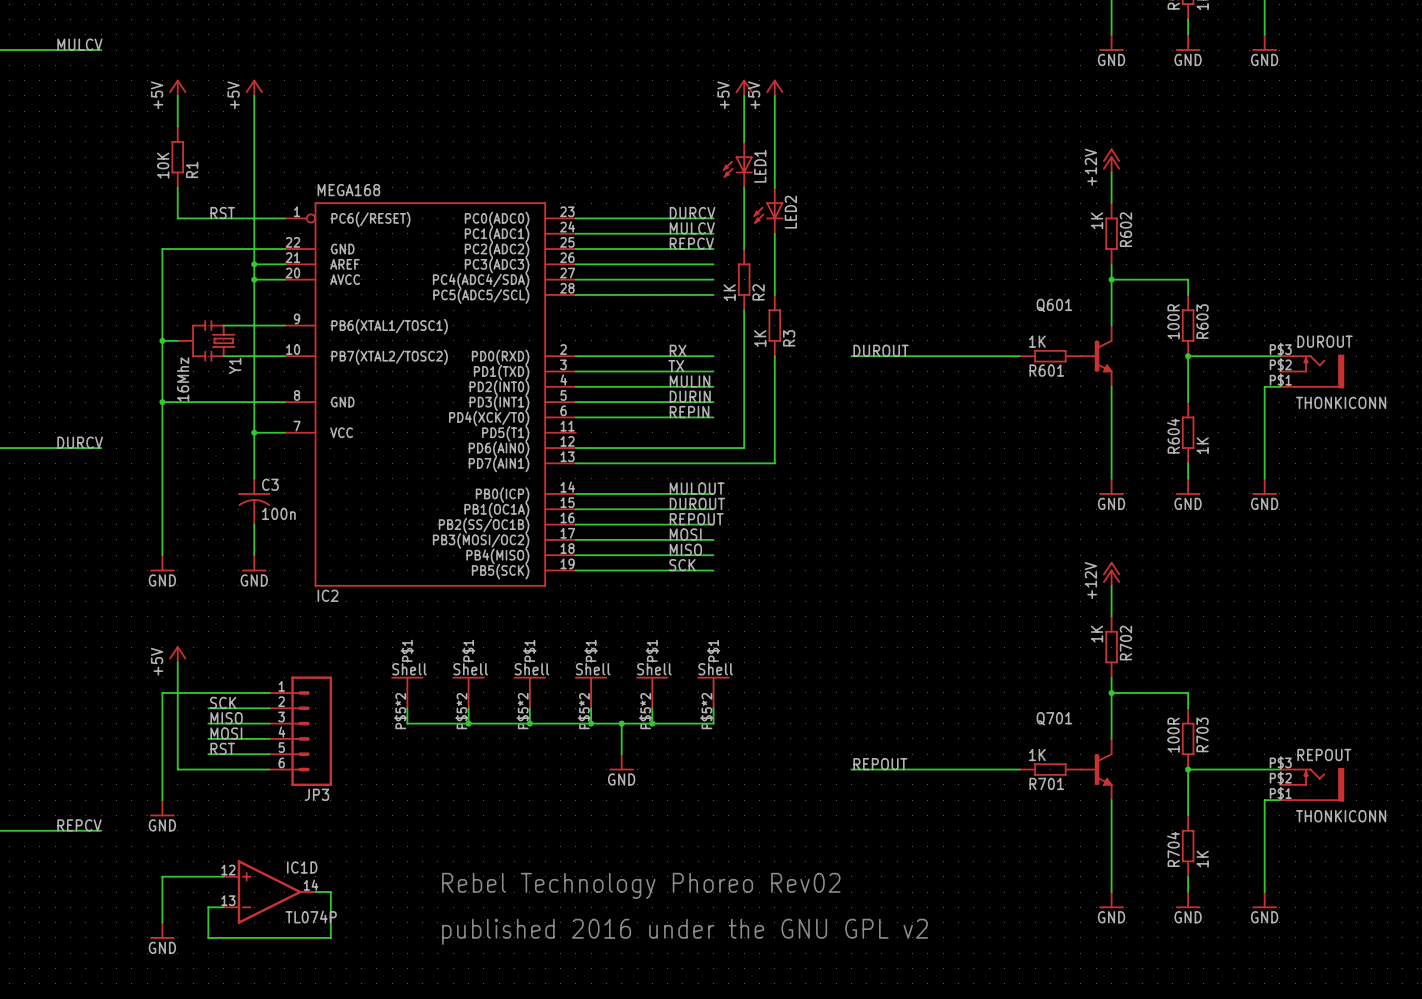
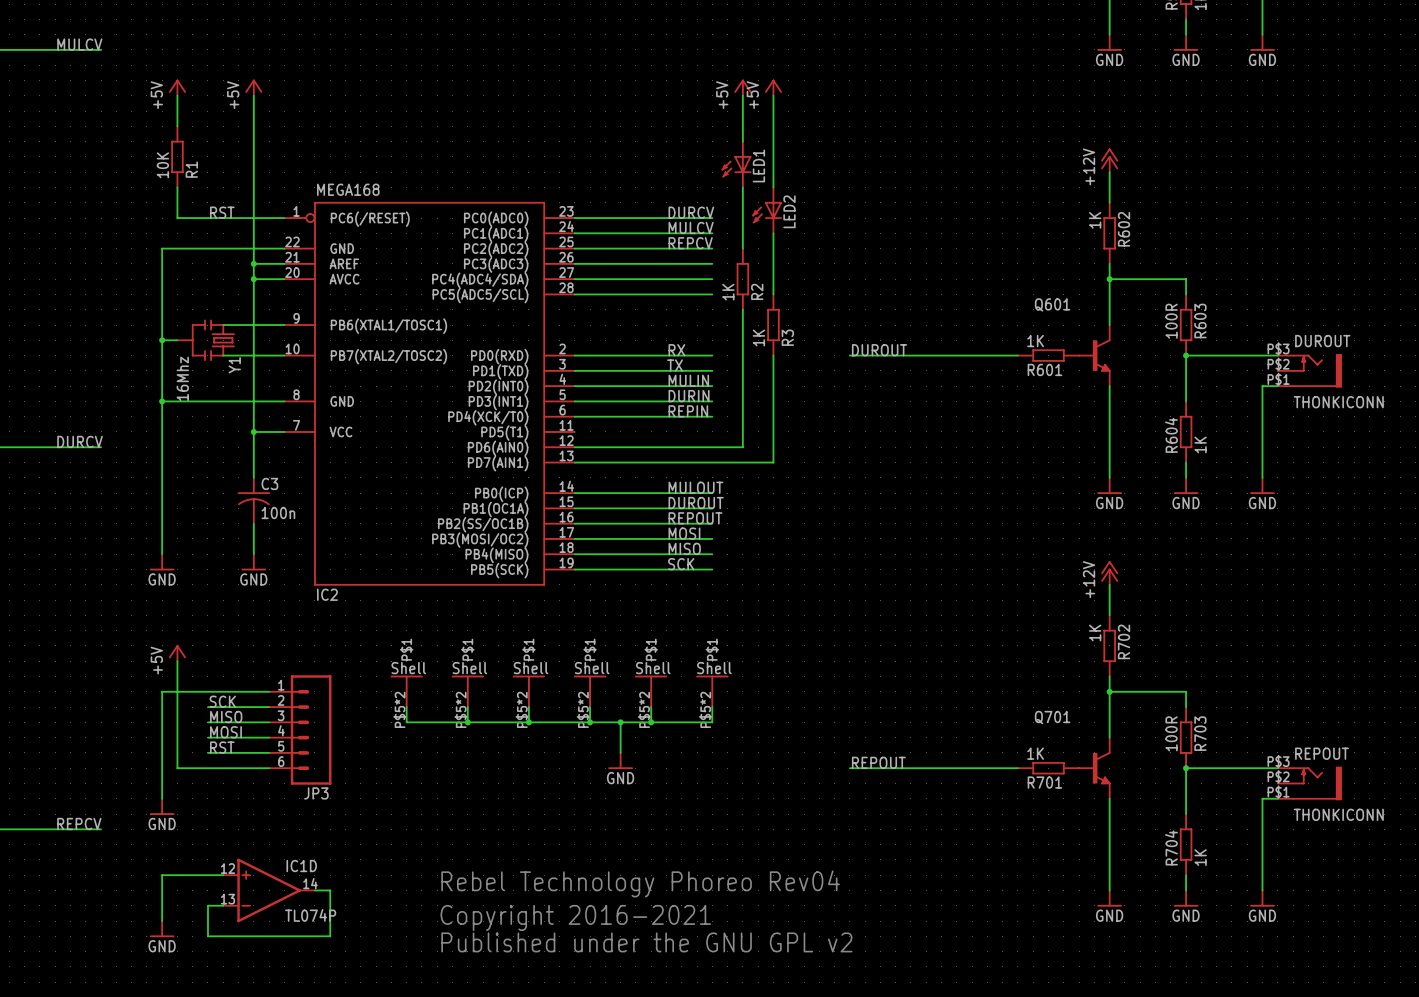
text: Rebel Technology Phoreo Rev02 (641, 885) -> Rebel Technology Phoreo Rev04 (640, 883)
text: none -> Copyright 2016-2021 (575, 917)
text: published 2016 under the GNU GPL v2 (684, 931) -> Published under the GNU GPL v2 (646, 942)

